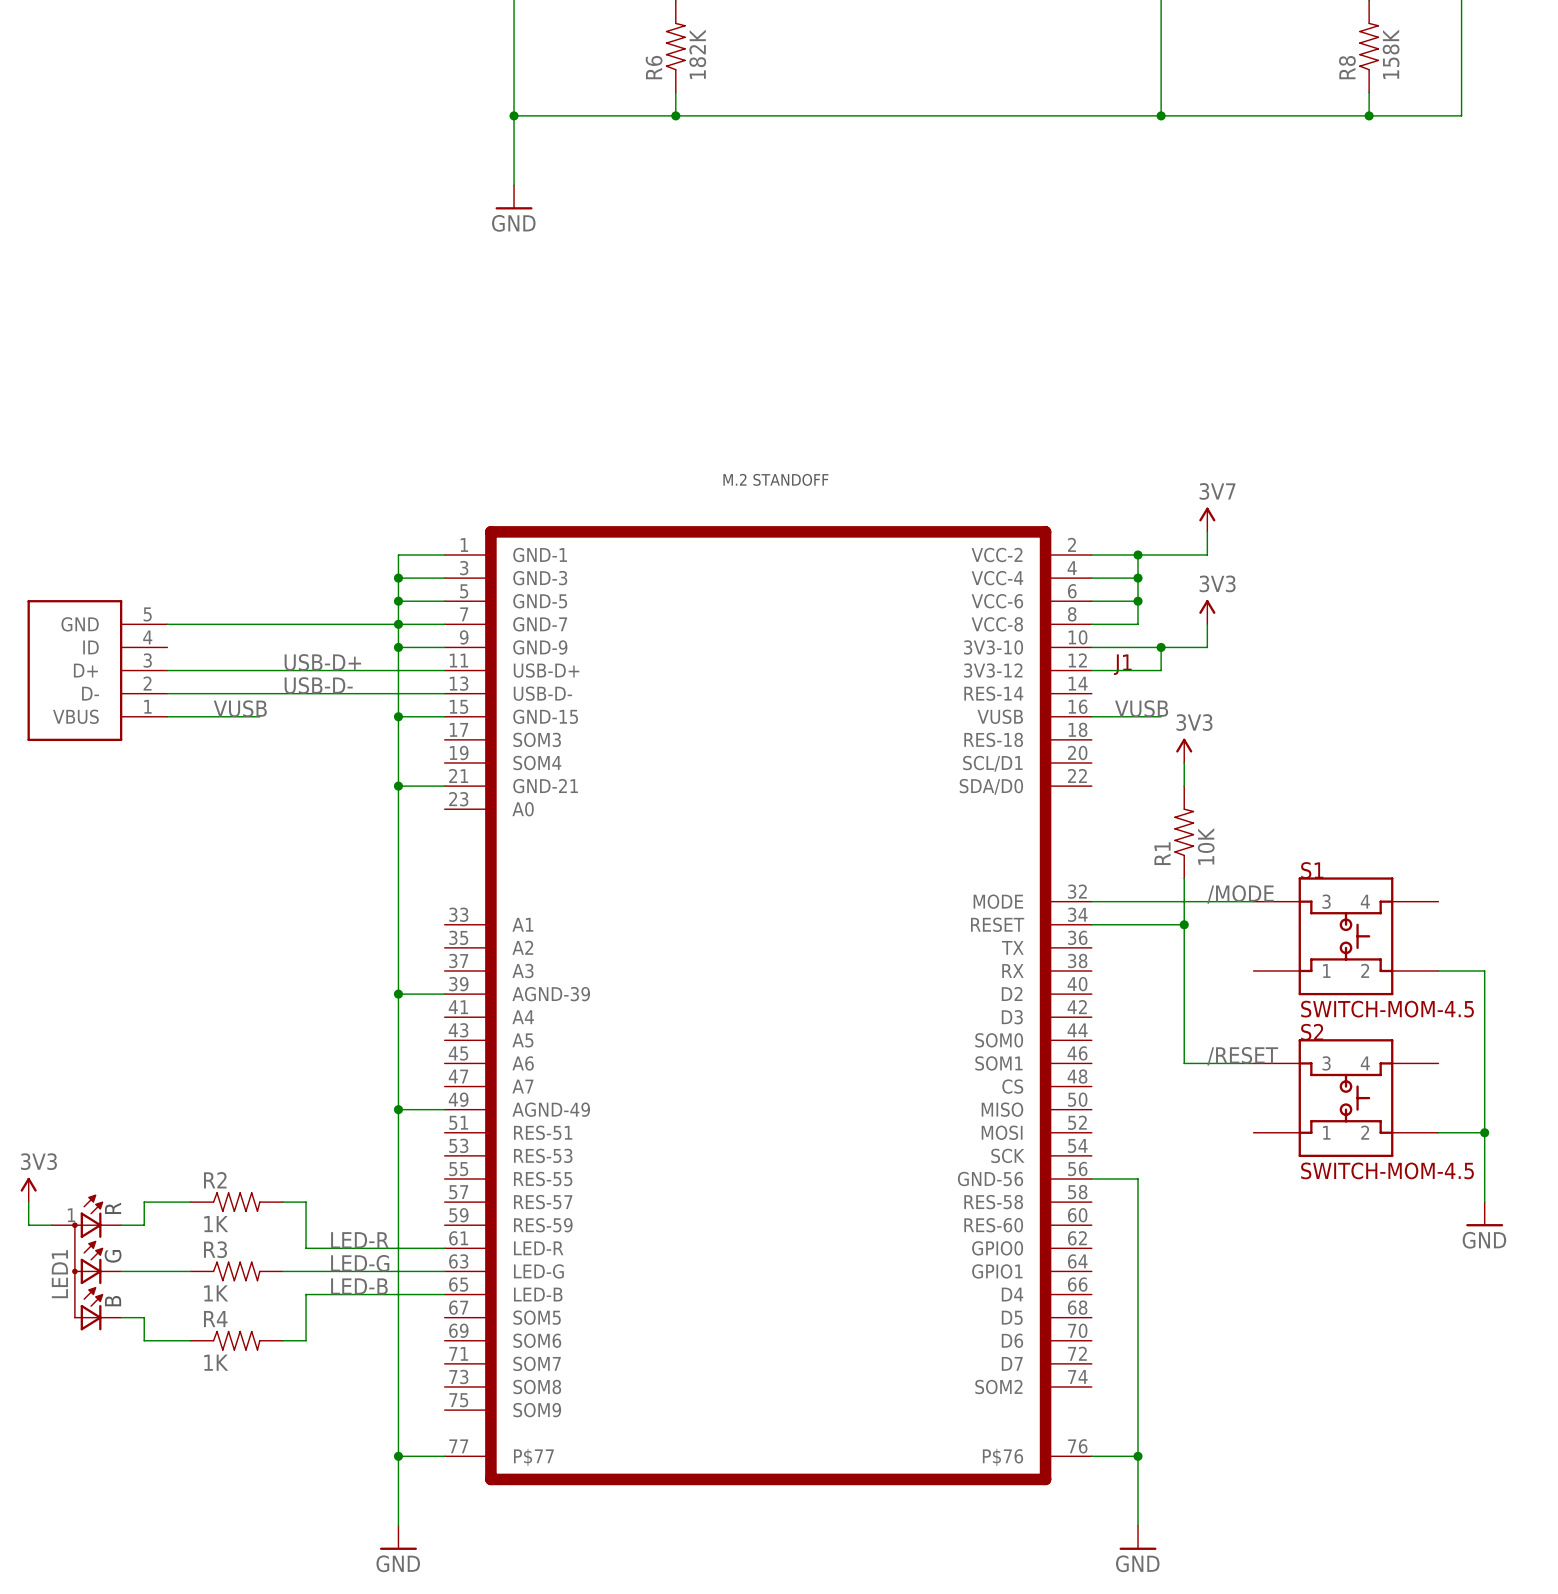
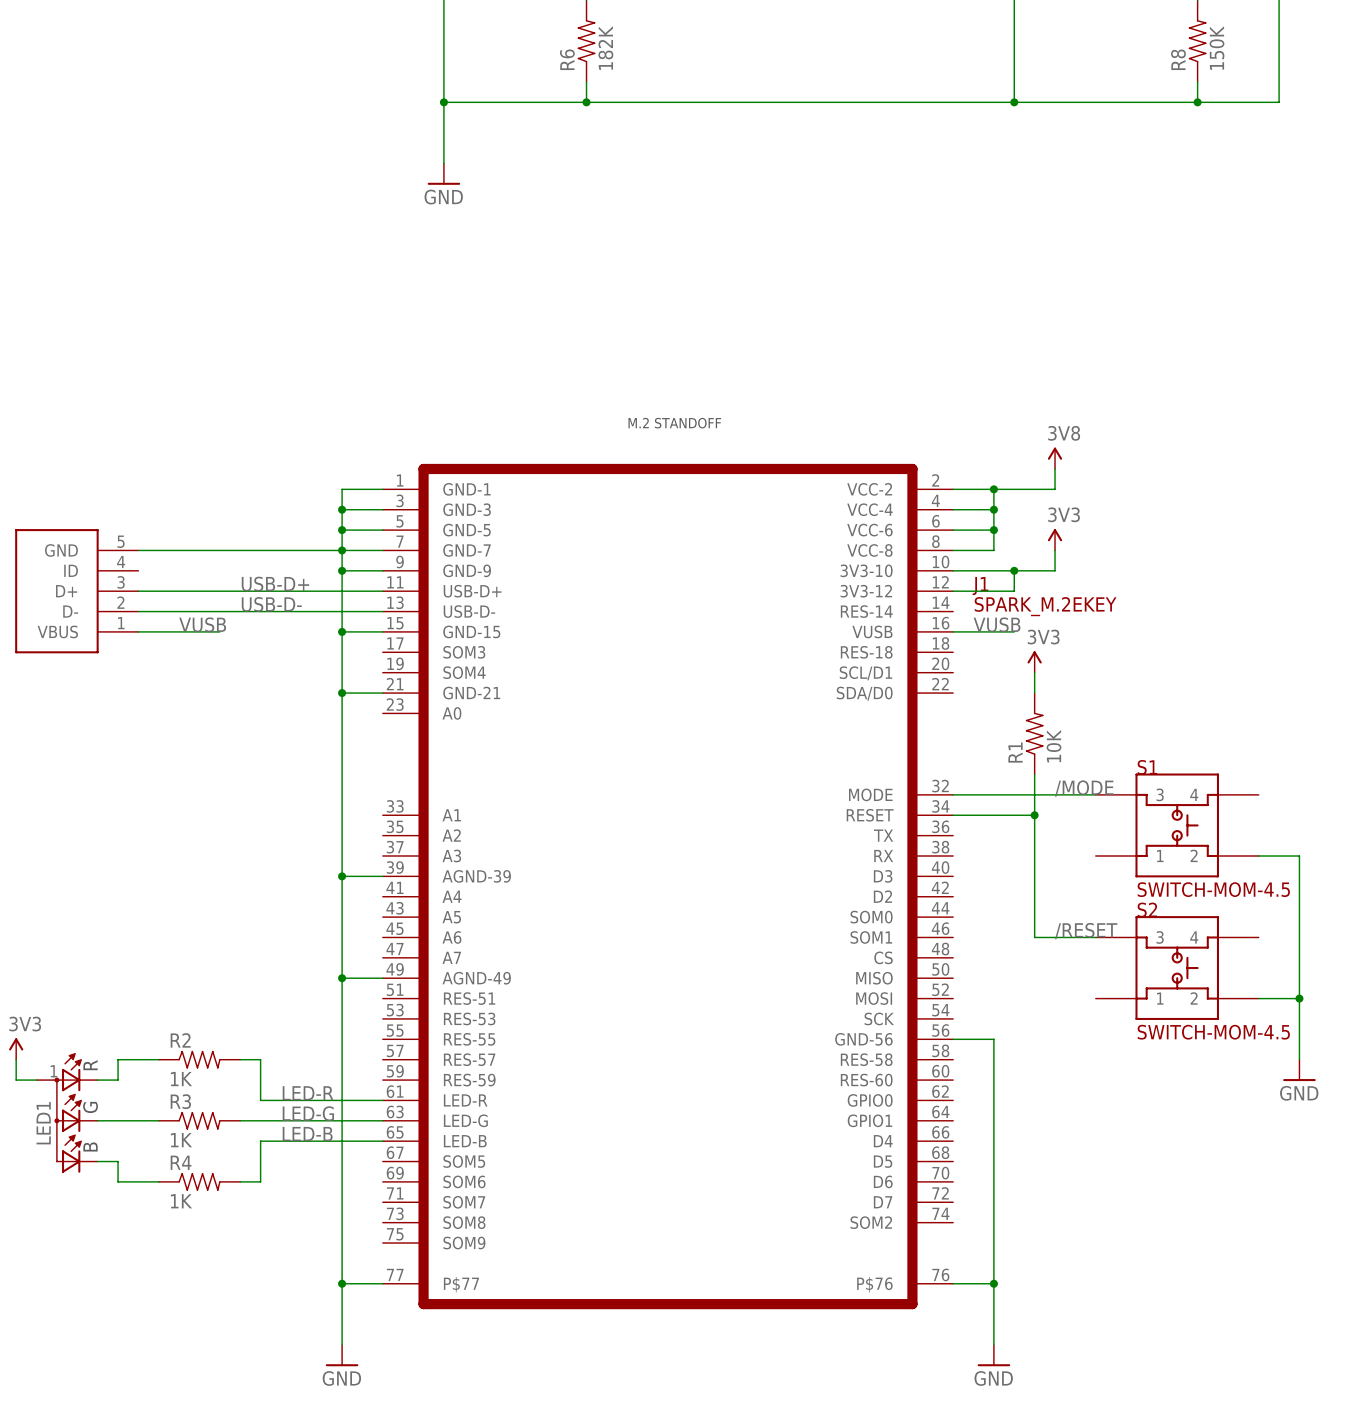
R8 value: 158K (1391, 54) -> 150K (1216, 48)
power symbol: 3V7 (1207, 519) -> 3V8 (1055, 458)
J1 value: none -> SPARK_M.2EKEY (1045, 606)
J1 pin name: D2 (1012, 993) -> D3 (883, 876)
J1 pin name: D3 (1012, 1017) -> D2 (882, 896)

